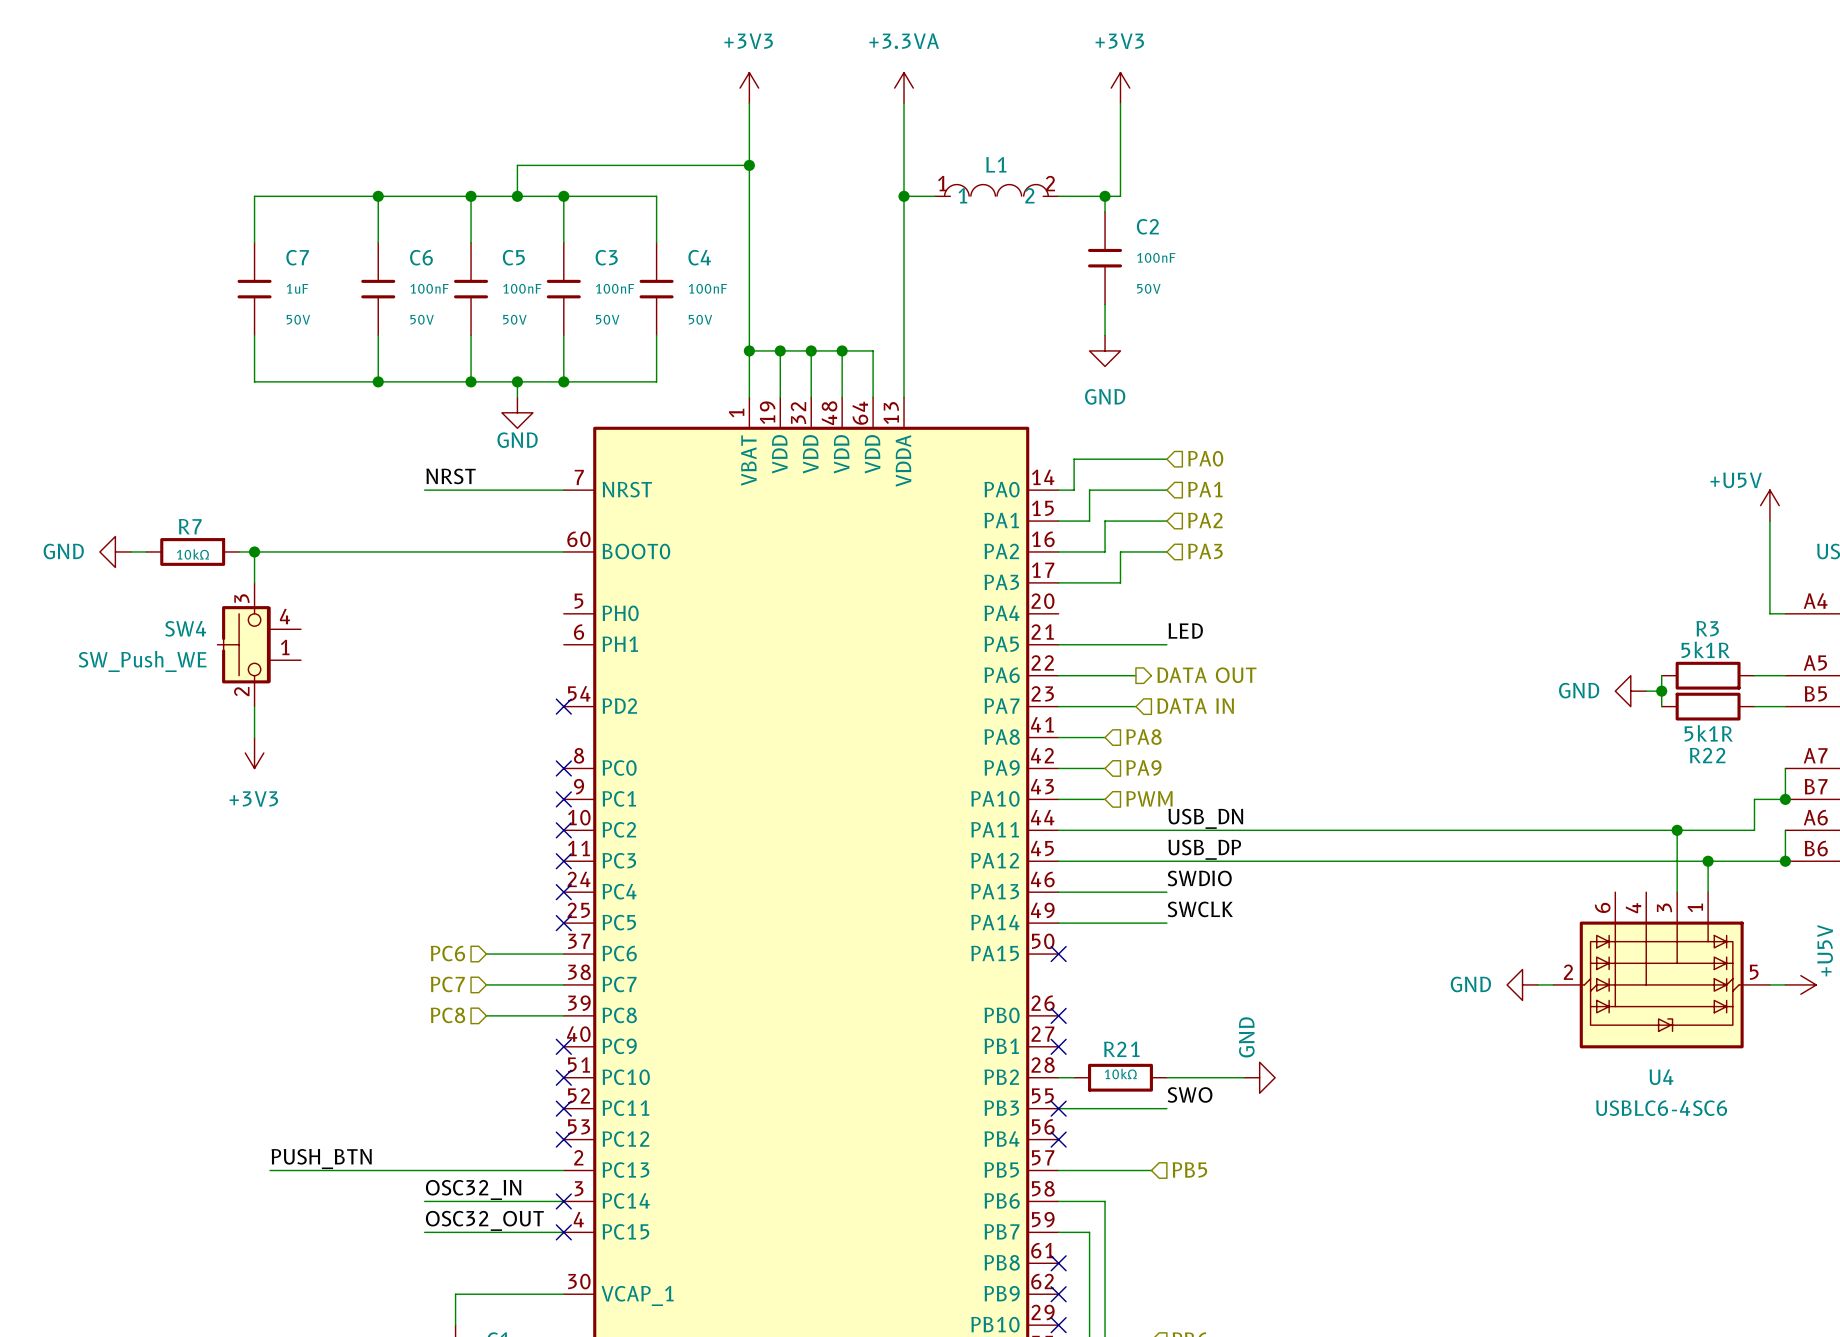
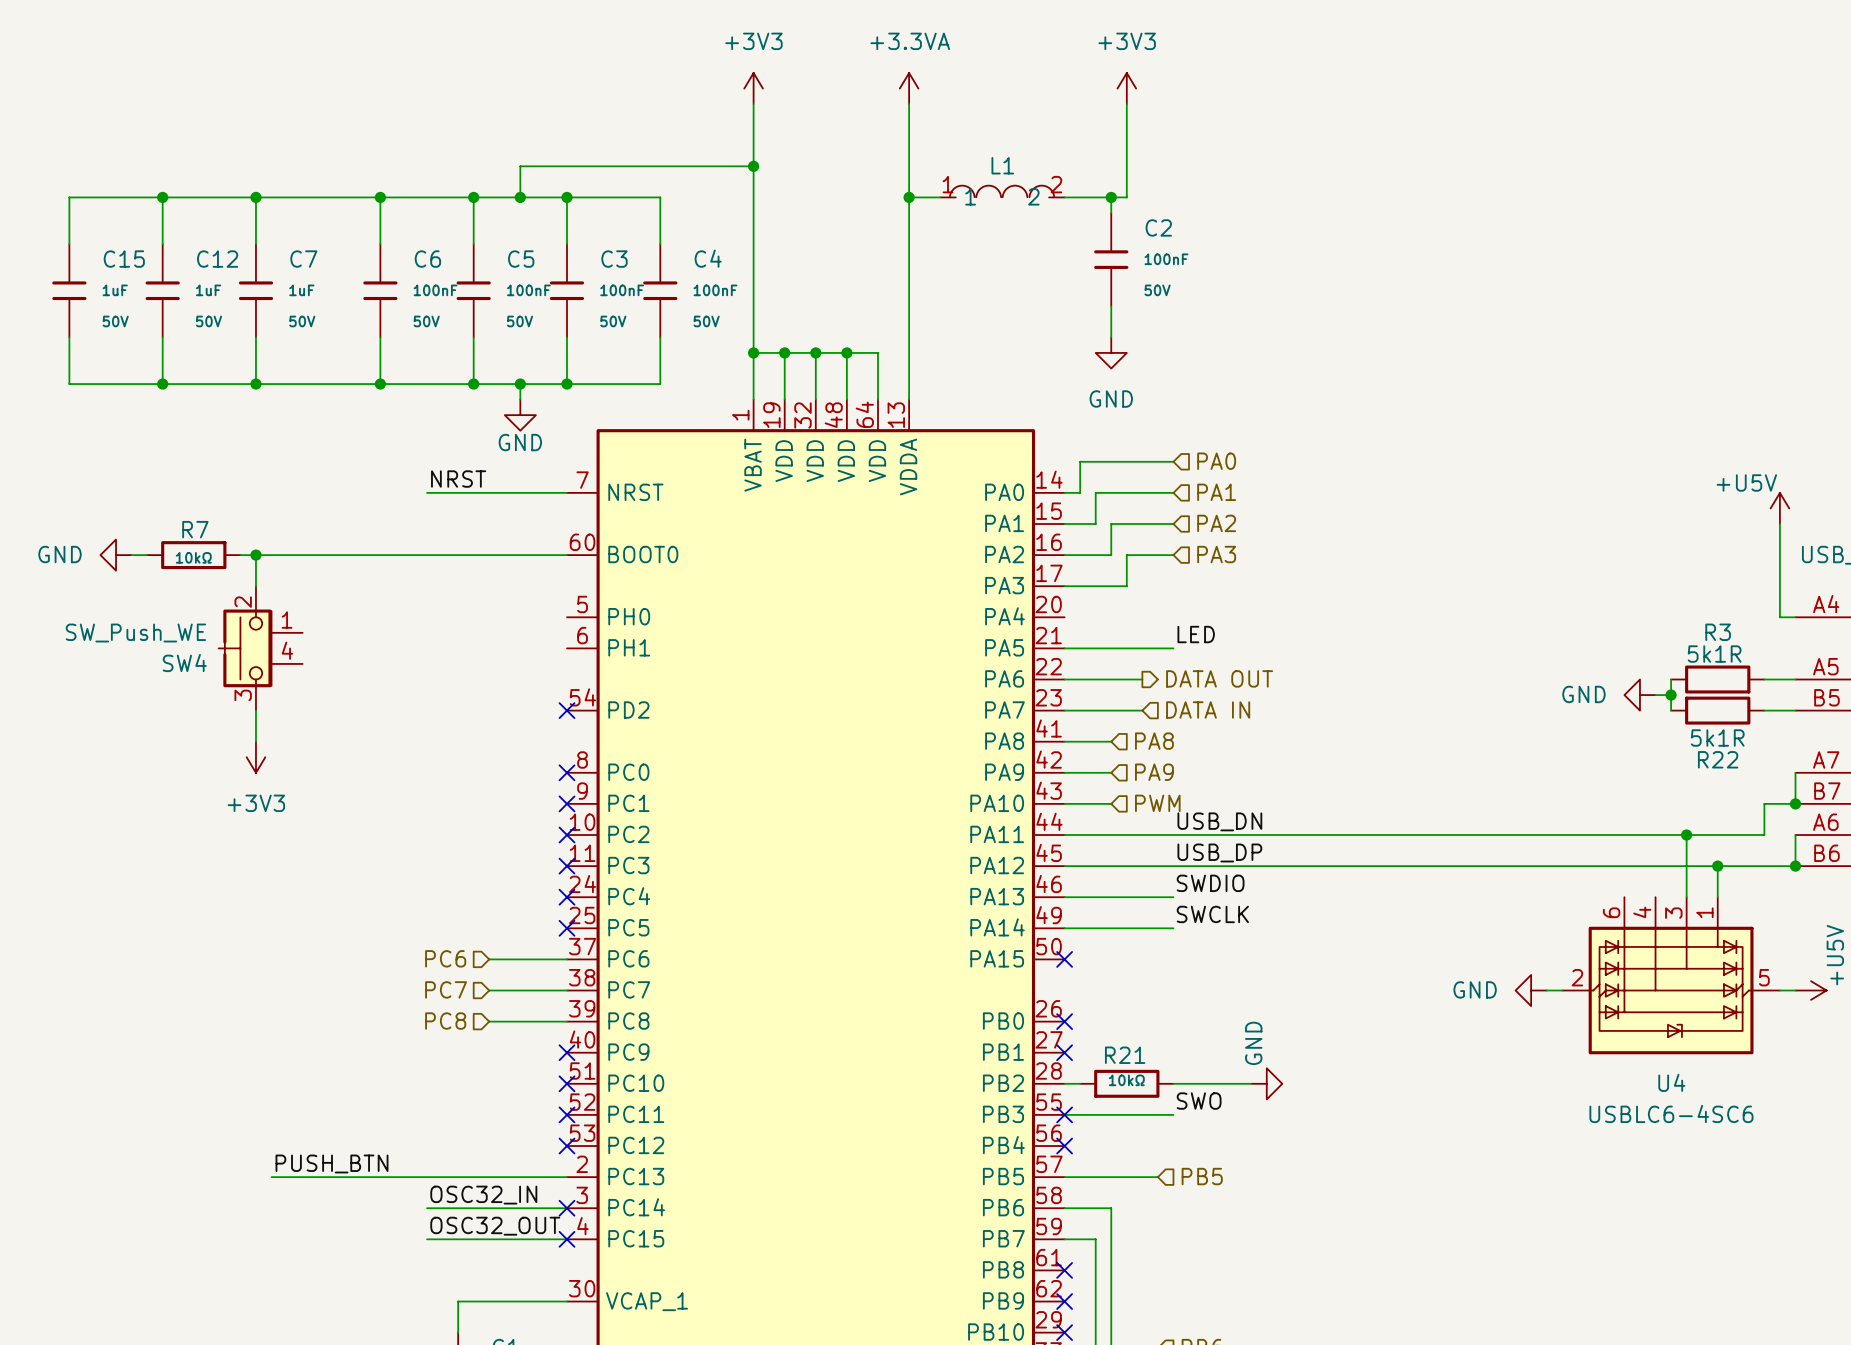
wire: none -> (162, 197) (162, 244)
junction: none -> (162, 197)
wire: none -> (255, 197) (69, 197) (69, 244)
junction: none -> (255, 197)
C15: none -> 1uF (69, 290)
C12: none -> 1uF (162, 290)
wire: none -> (69, 337) (69, 384) (255, 384)
wire: none -> (162, 337) (162, 384)
junction: none -> (162, 384)
junction: none -> (255, 384)
SW4 flip: as is (243, 644) -> up-down (245, 648)

